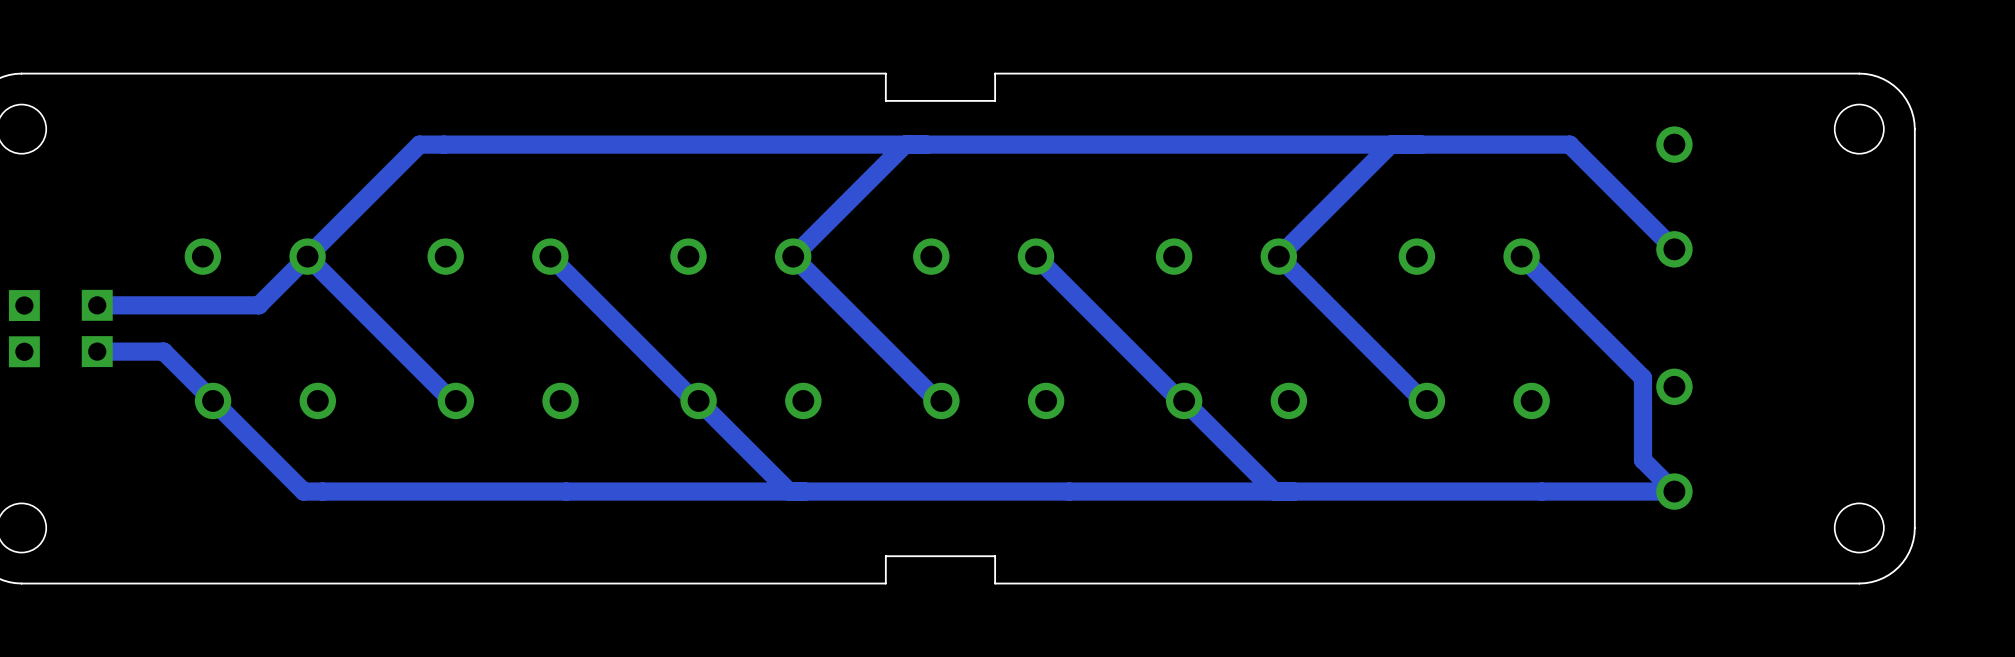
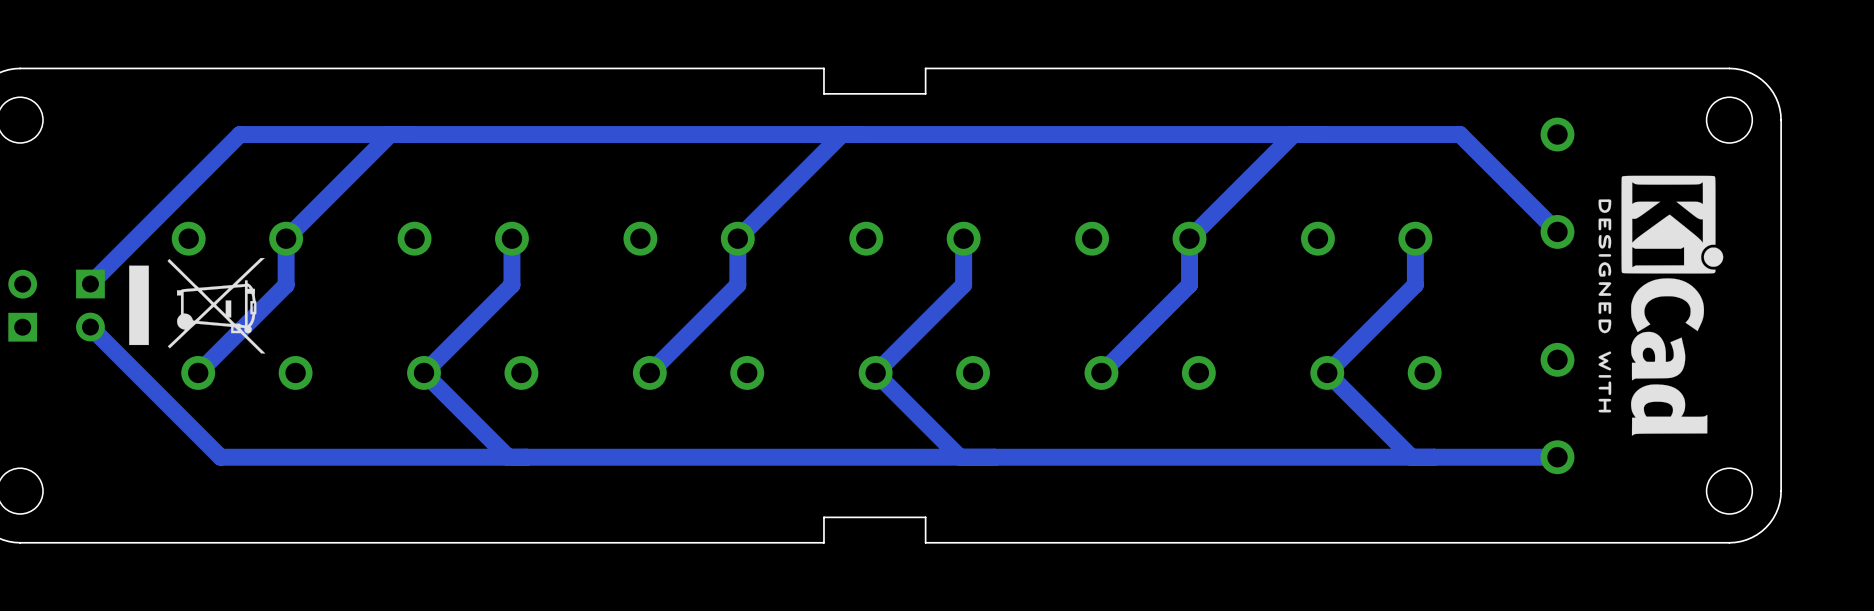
drawing: none -> [1598, 175, 1724, 436]
track: none -> (286, 238) (286, 285) (198, 372)
track: (550, 256) (694, 400) (698, 400) (789, 491) -> (511, 238) (511, 284) (424, 372) (508, 457)
track: (793, 256) (937, 400) (941, 400) -> (737, 238) (737, 284) (649, 372)
track: (1036, 256) (1180, 400) (1184, 400) (1274, 491) -> (963, 238) (963, 284) (875, 372) (959, 457)
track: (1278, 256) (1423, 400) (1426, 400) -> (1189, 238) (1189, 284) (1101, 372)
track: (1521, 256) (1643, 378) (1643, 460) (1674, 491) -> (1415, 238) (1415, 284) (1327, 372) (1411, 457)
drawing: none -> [129, 257, 266, 354]
part footprint: [81, 289, 113, 368] -> [76, 269, 105, 342]
part footprint: [8, 290, 40, 368] -> [8, 269, 38, 342]
track: (97, 305) (258, 305) (307, 256) (451, 400) (455, 400) -> (90, 284) (239, 134) (390, 134)
track: (97, 351) (163, 351) (303, 491) -> (90, 327) (220, 457) (282, 457)

